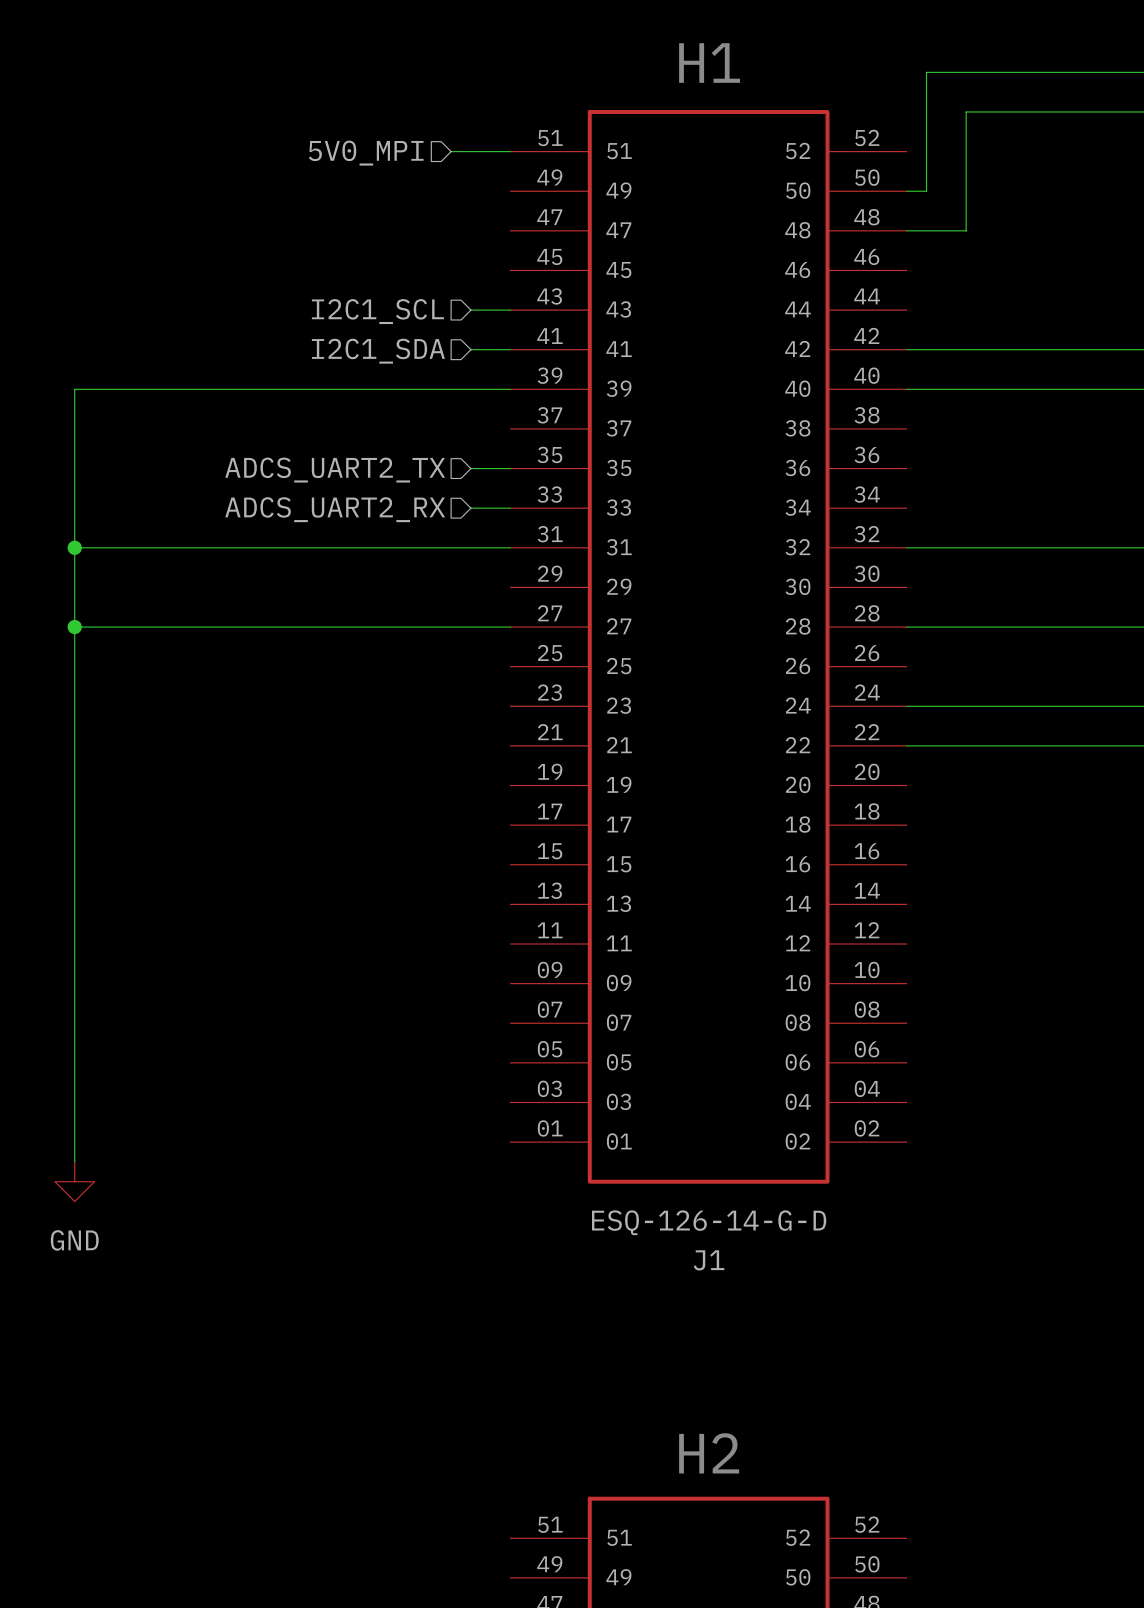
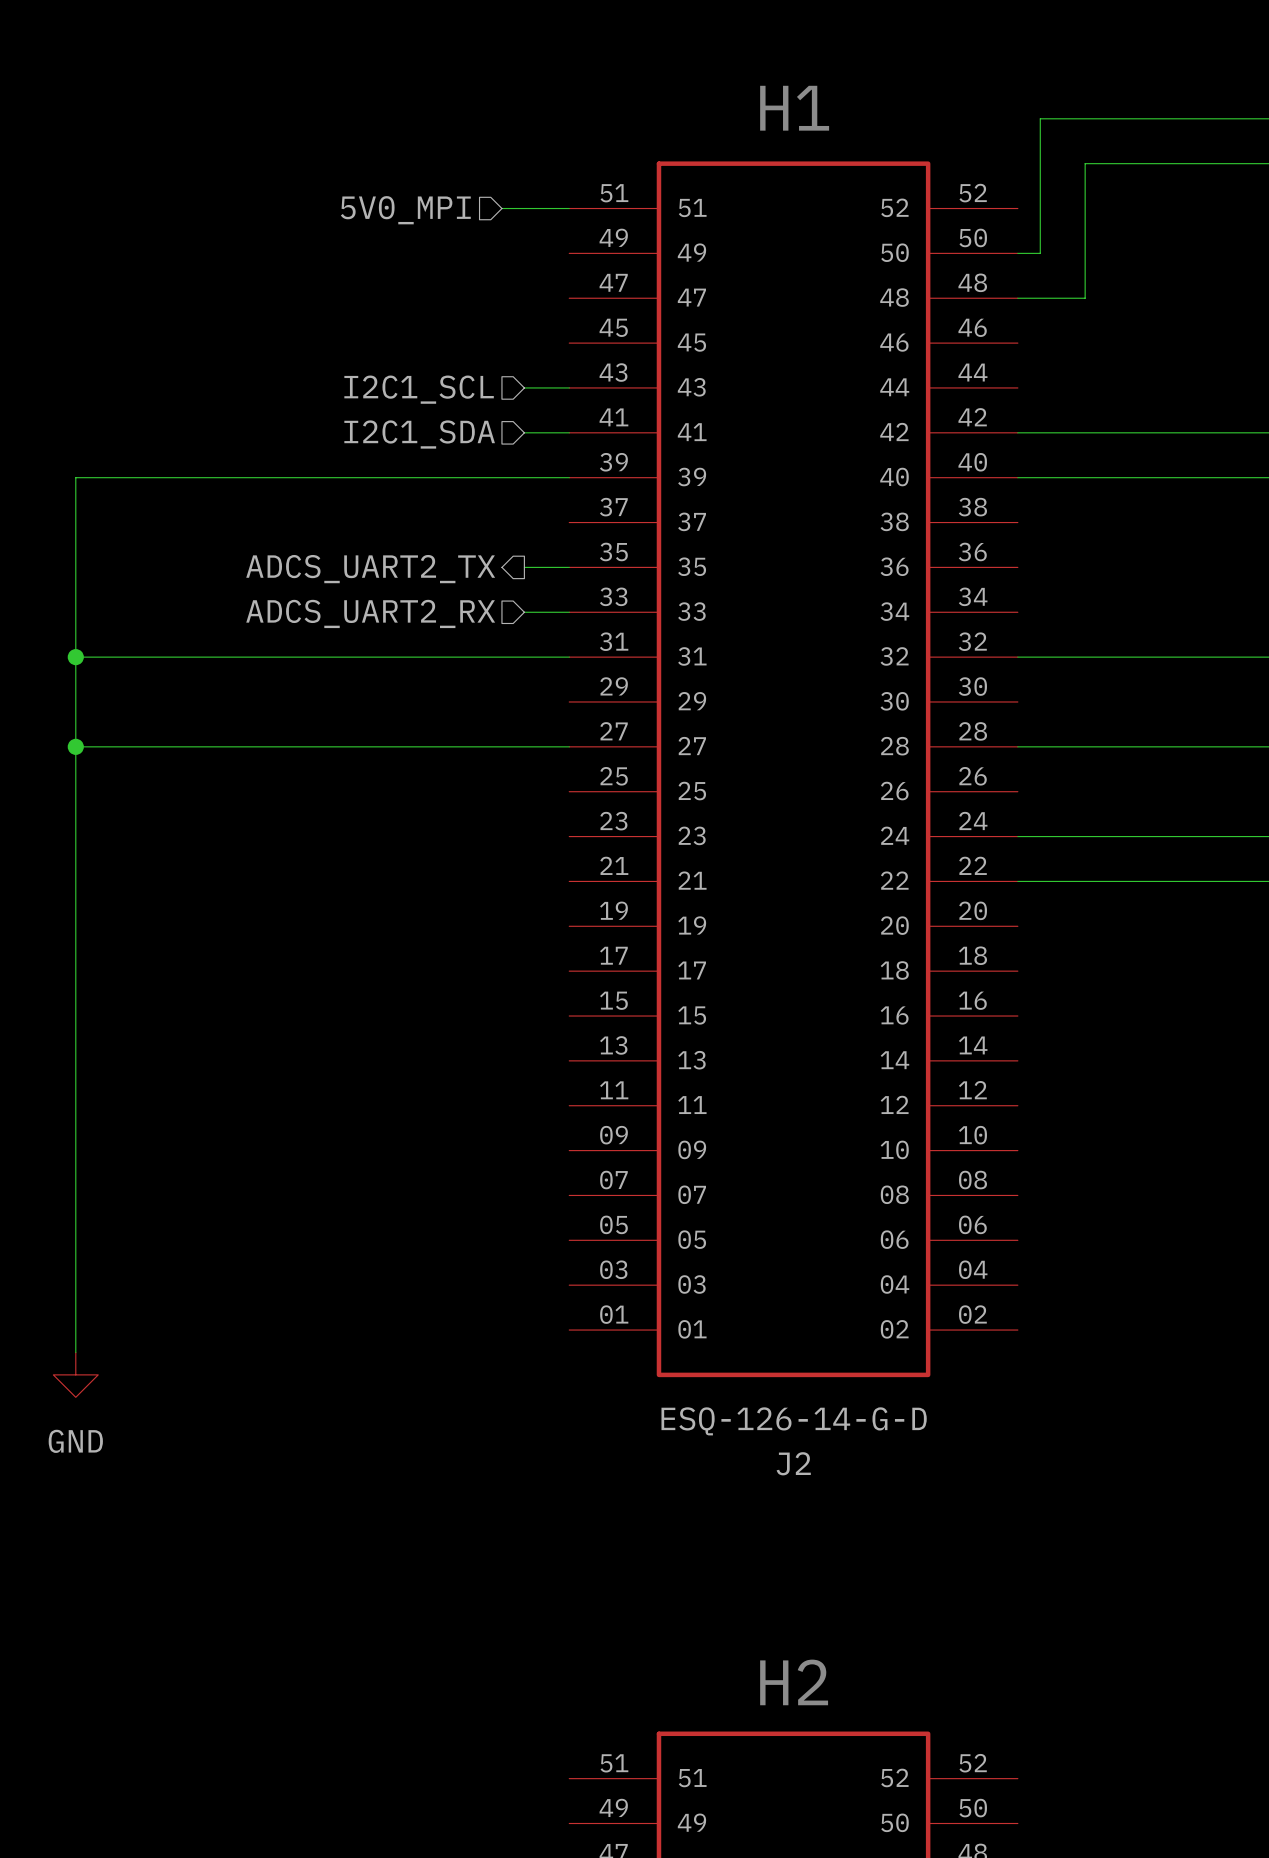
hierarchical label shape: input (335, 470) -> output (370, 569)
J1 name: J1 (709, 1260) -> J2 (793, 1463)

